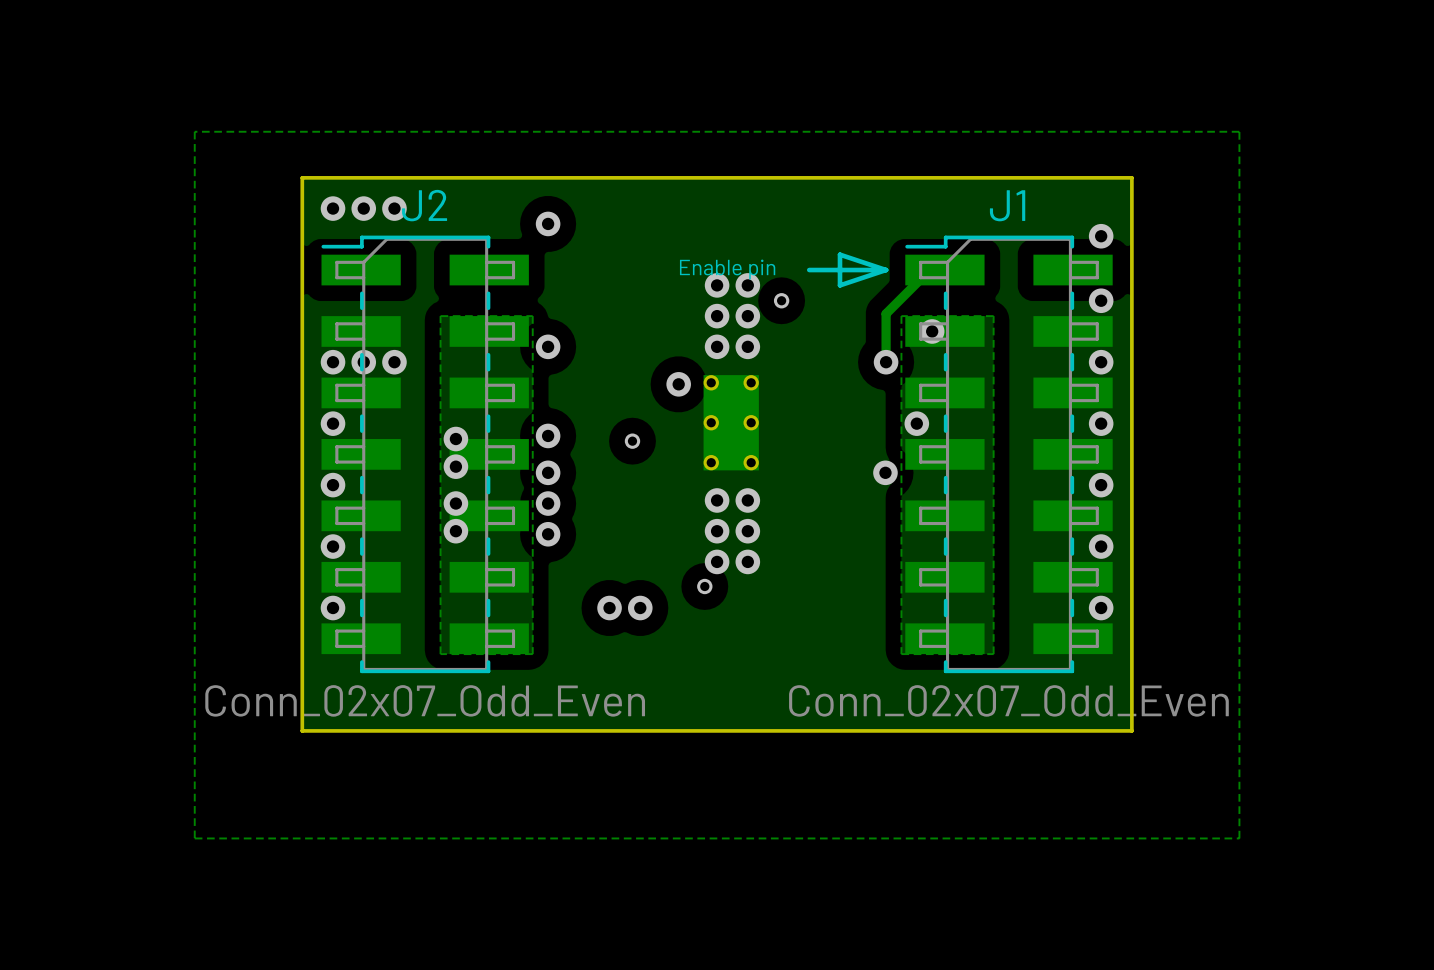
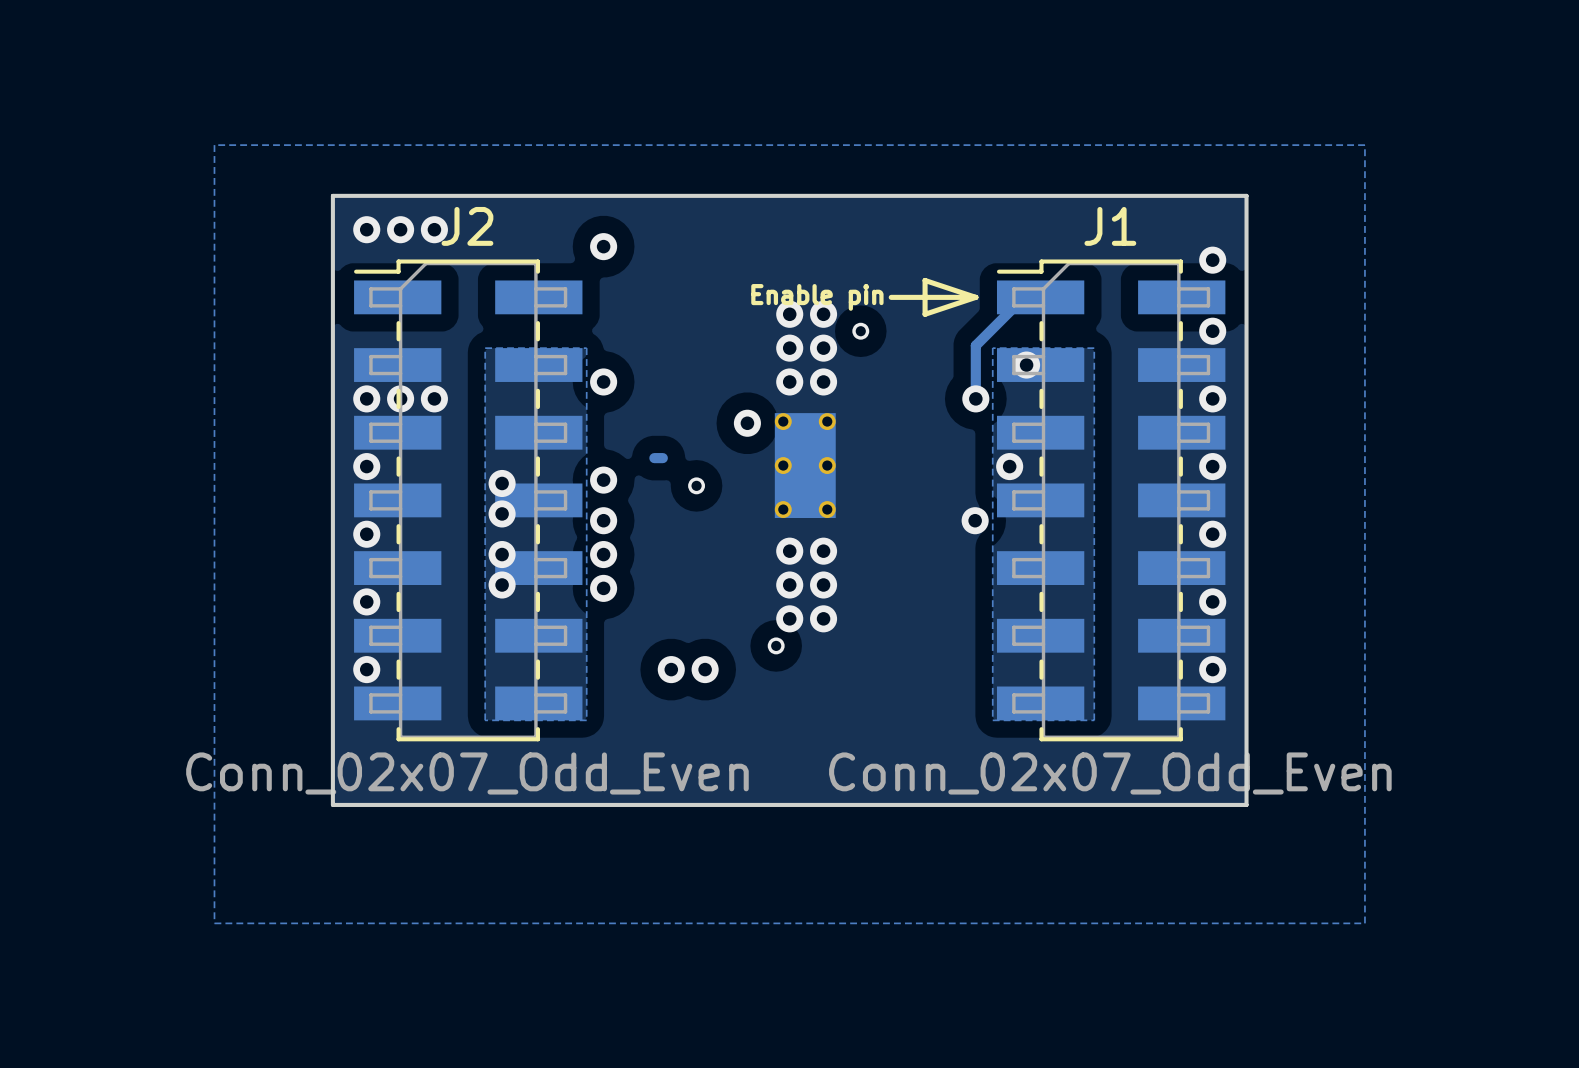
track: none -> (662, 458) (654, 458)

